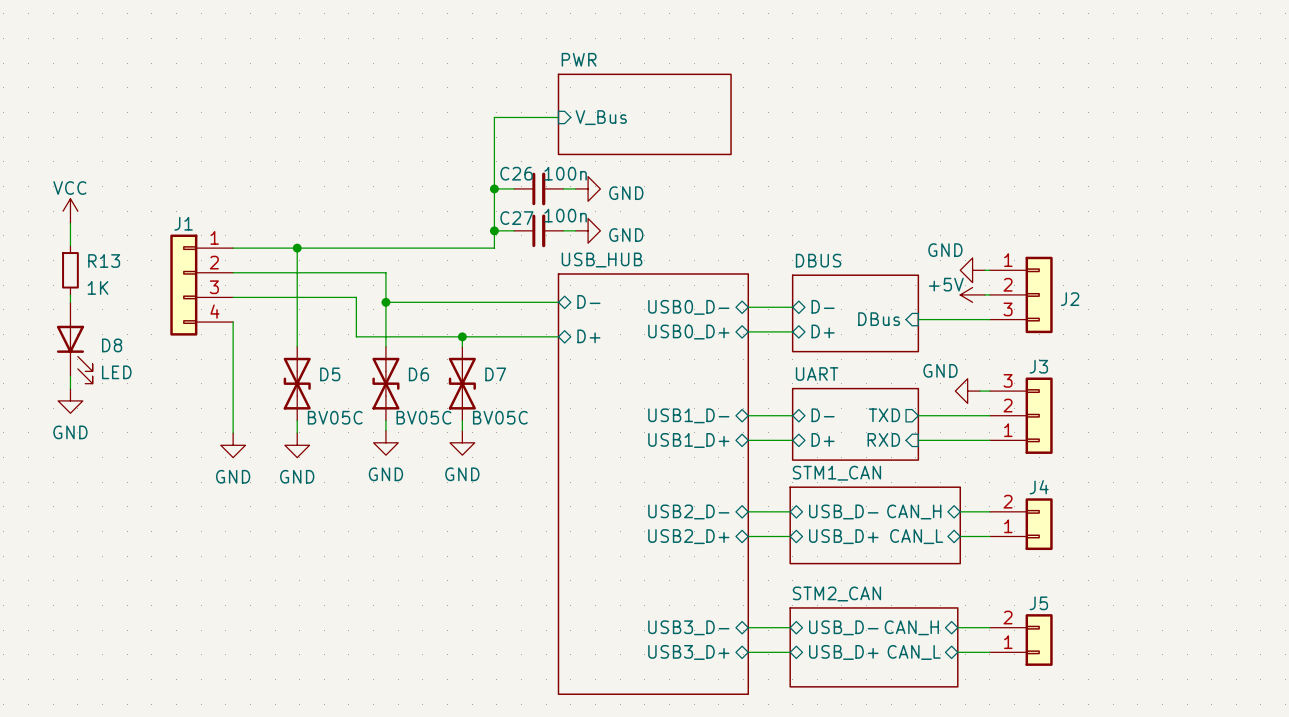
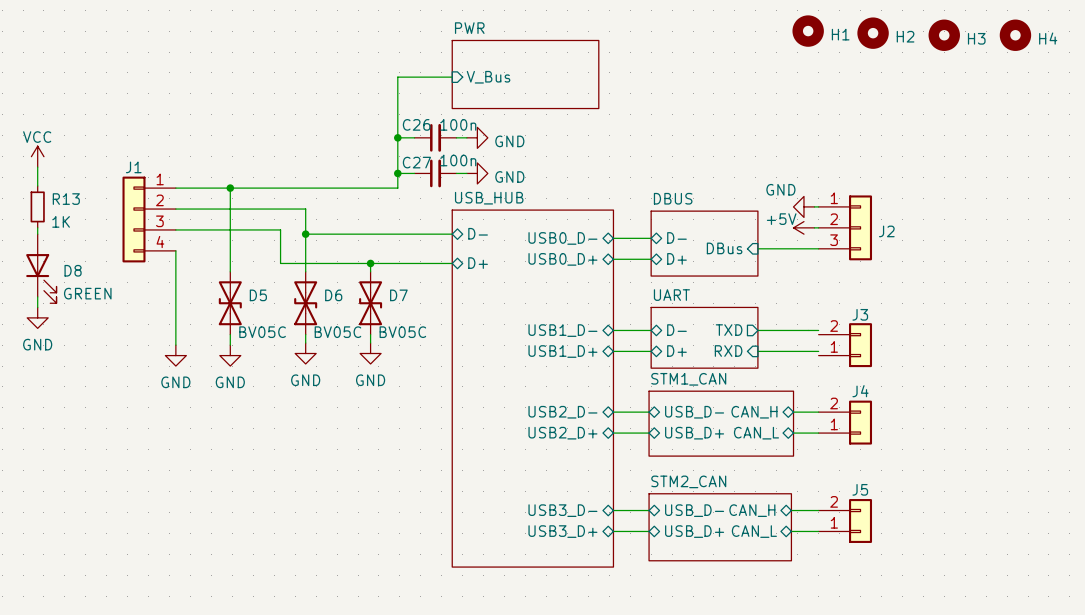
H1: none -> (808, 31)
H2: none -> (873, 33)
H3: none -> (944, 35)
H4: none -> (1015, 35)
D8 value: LED (116, 372) -> GREEN (87, 293)
J3 symbol: [989, 377, 1053, 454] -> [818, 323, 873, 368]
power symbol: GND (967, 391) -> none
wire: (979, 391) (989, 391) -> none

